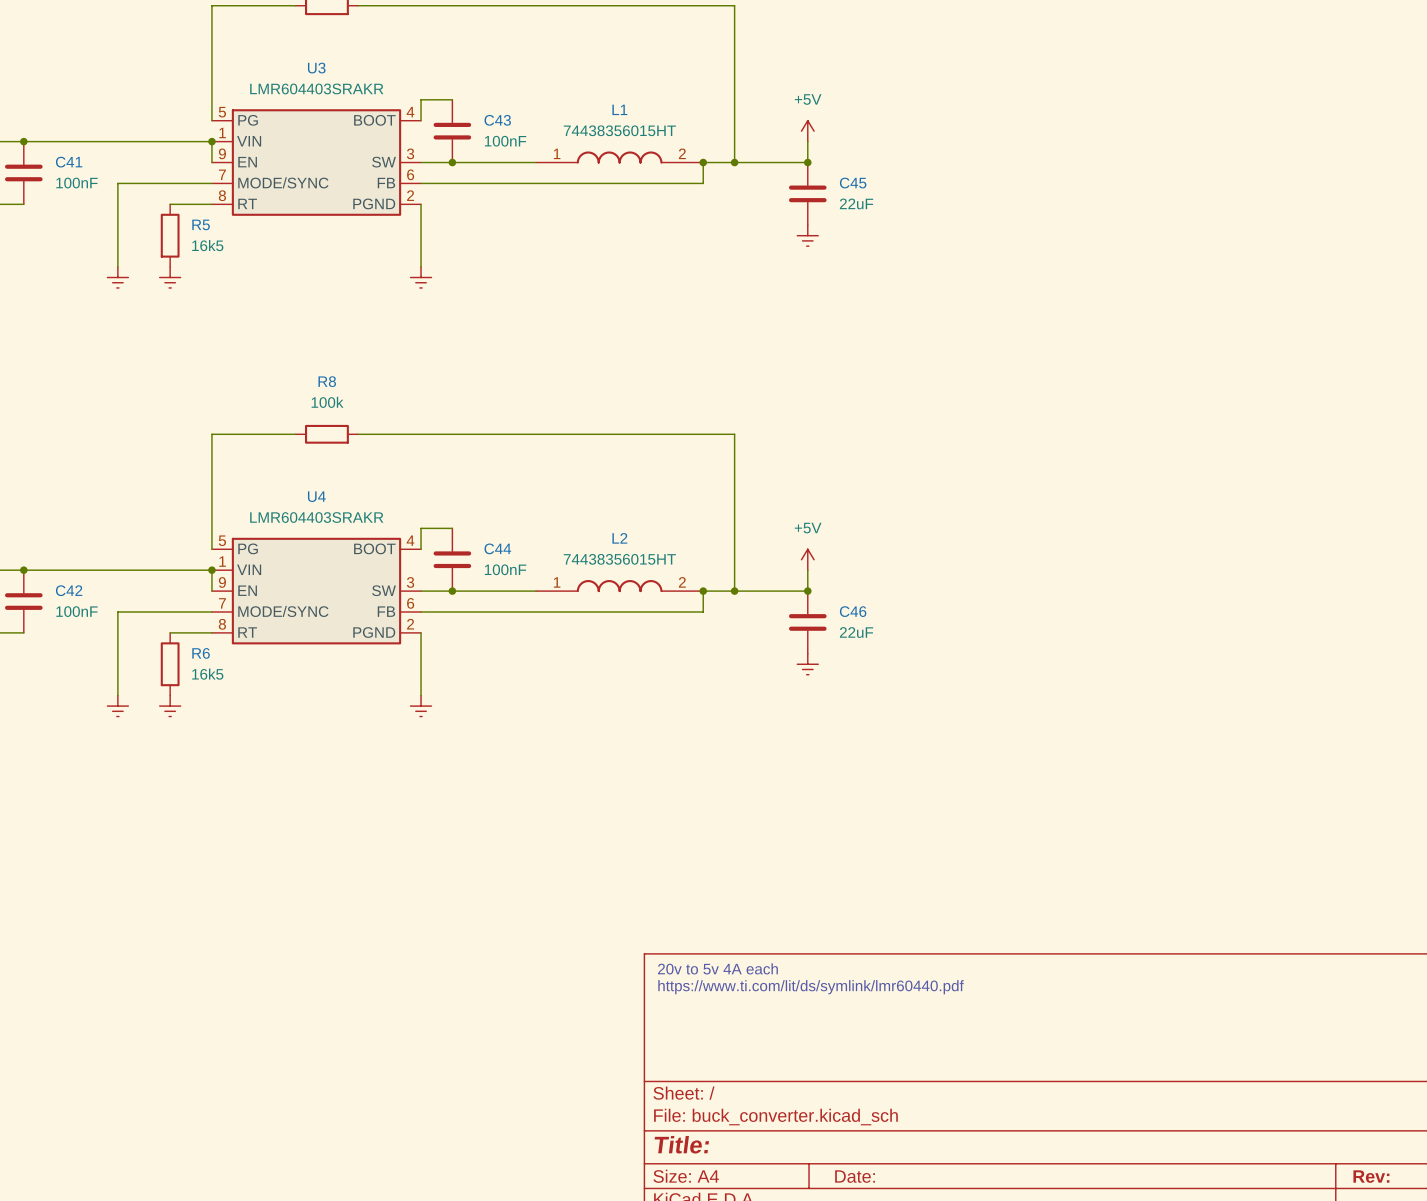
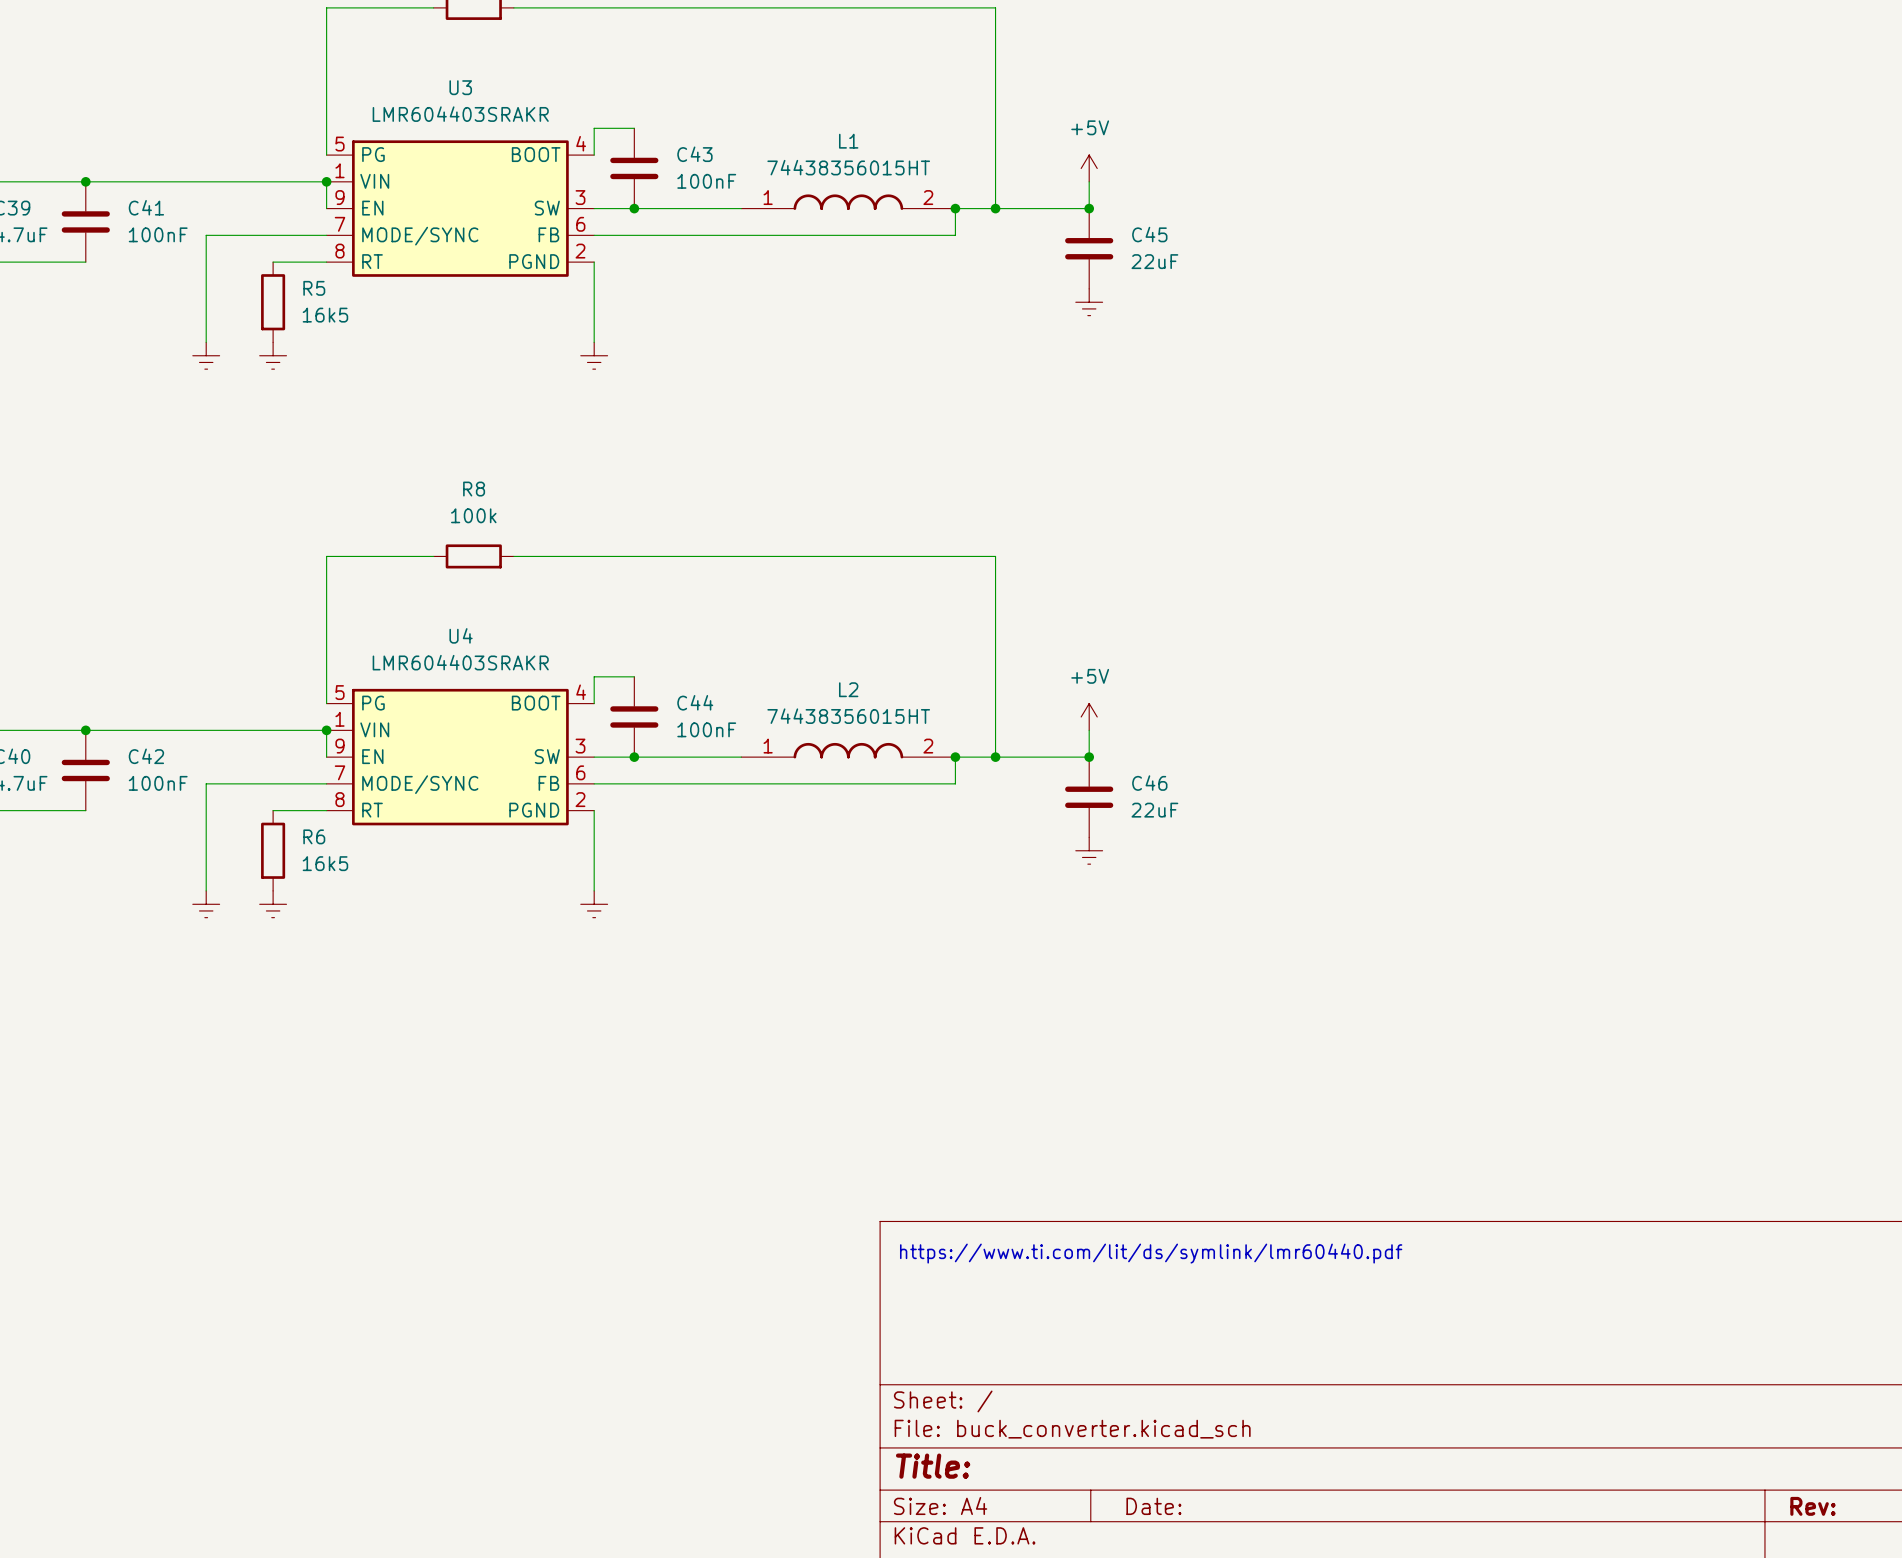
text: 20v to 5v 4A each (717, 968) -> none
text position: https://www.ti.com/lit/ds/symlink/lmr60440.pdf (811, 987) -> https://www.ti.com/lit/ds/symlink/lmr60440.pdf (1151, 1253)

